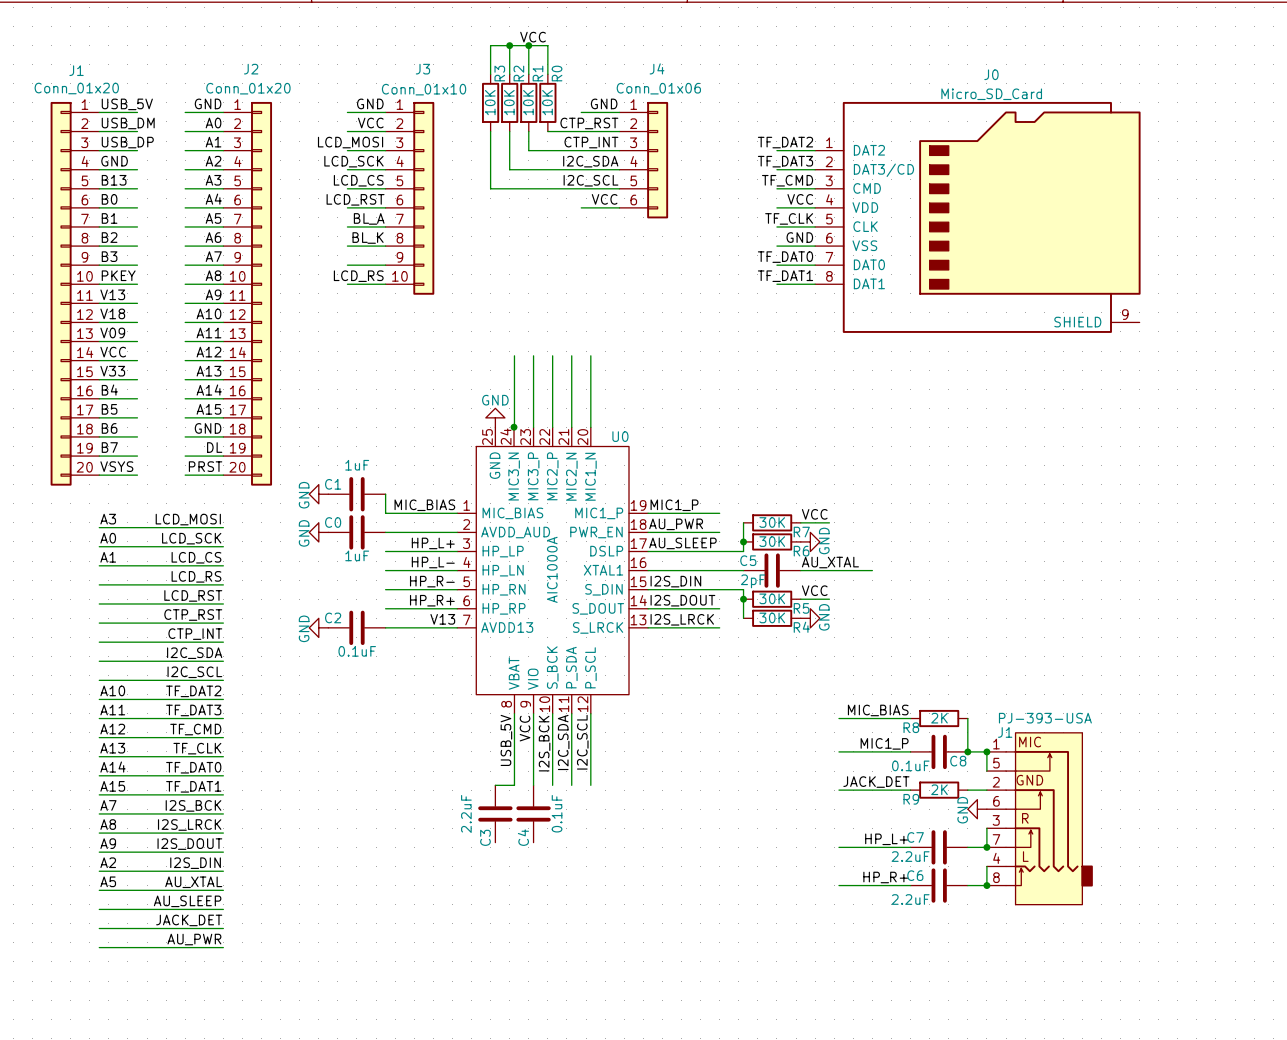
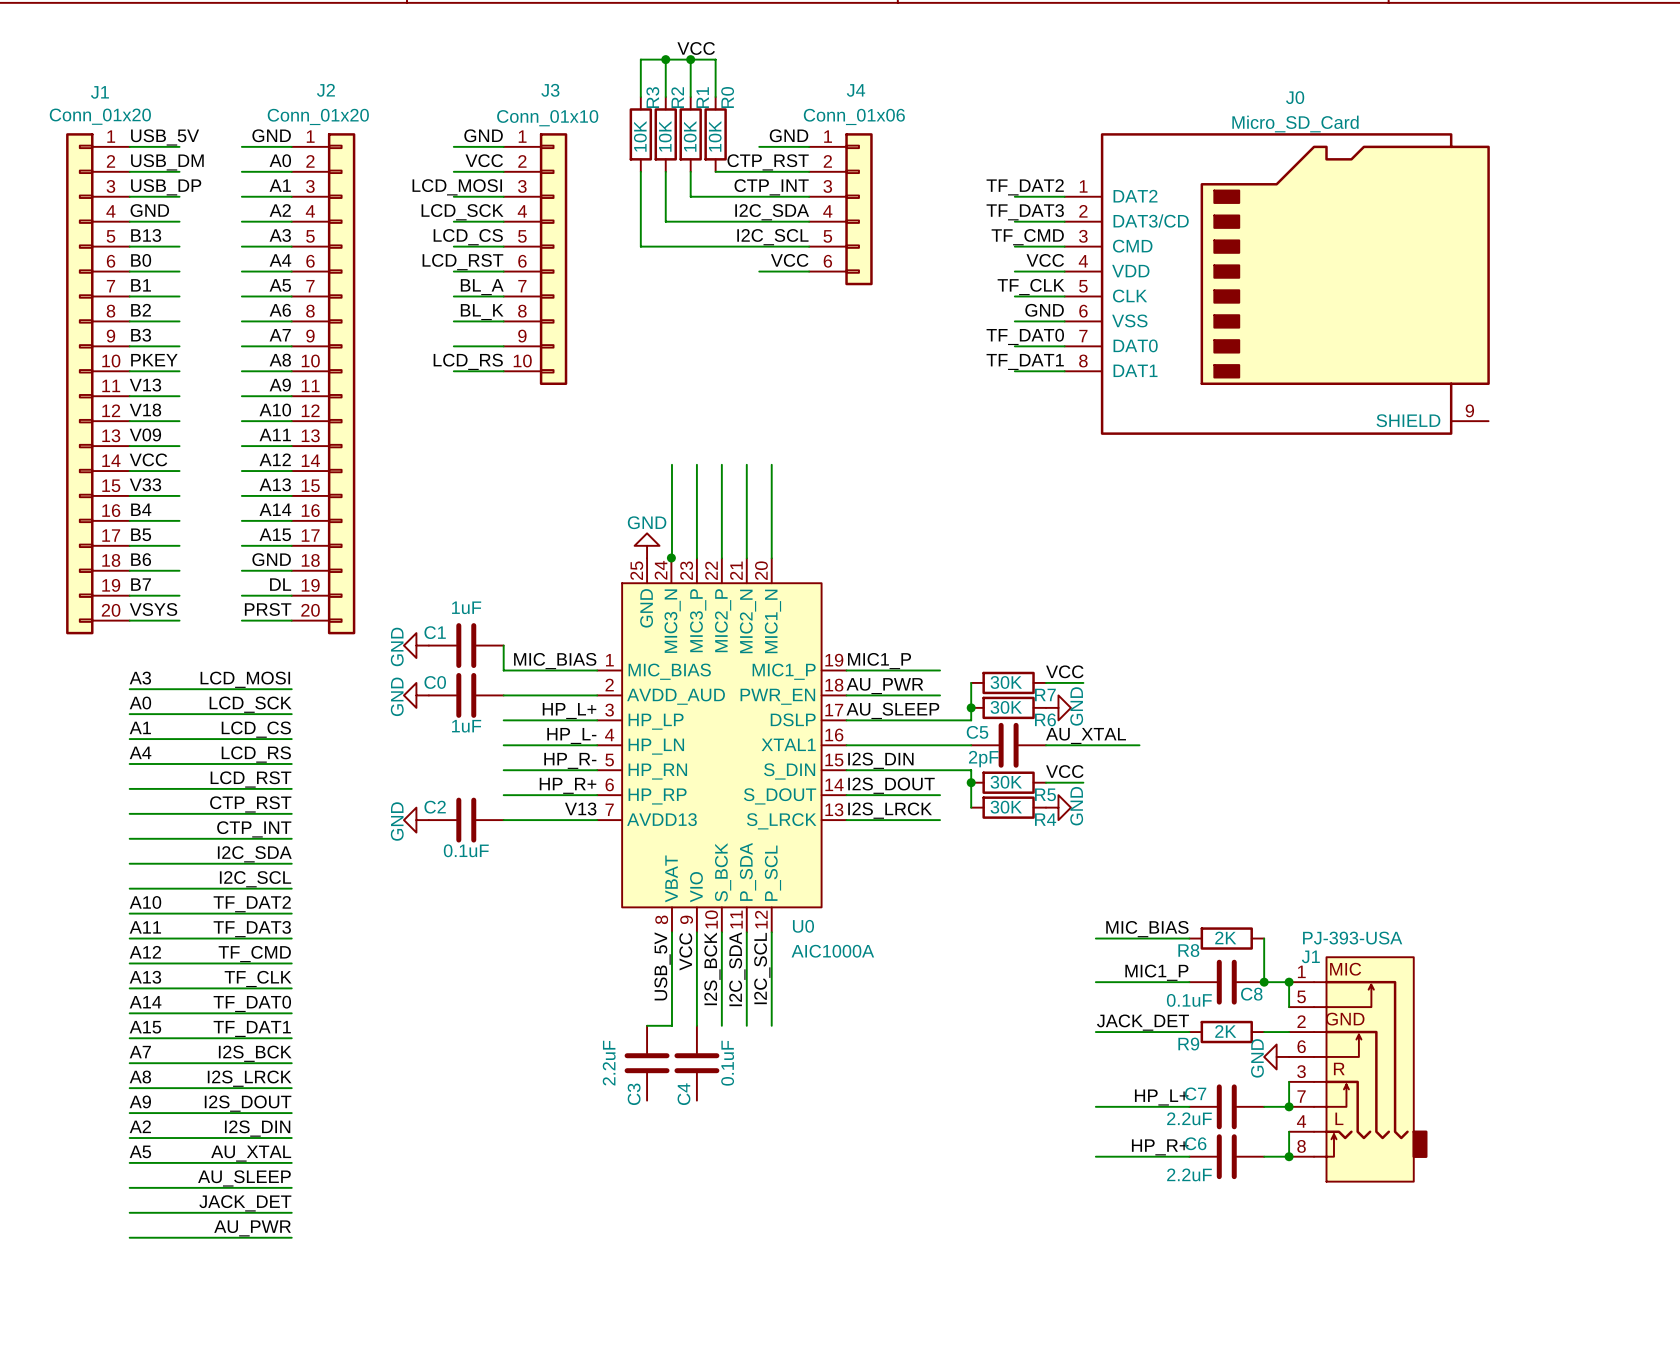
U0 symbol: [457, 427, 649, 714] -> [597, 558, 847, 933]
U0 name position: U0 (620, 436) -> U0 (803, 926)
U0 value position: AIC1000A (552, 569) -> AIC1000A (832, 951)
label: none -> A4 (140, 752)

